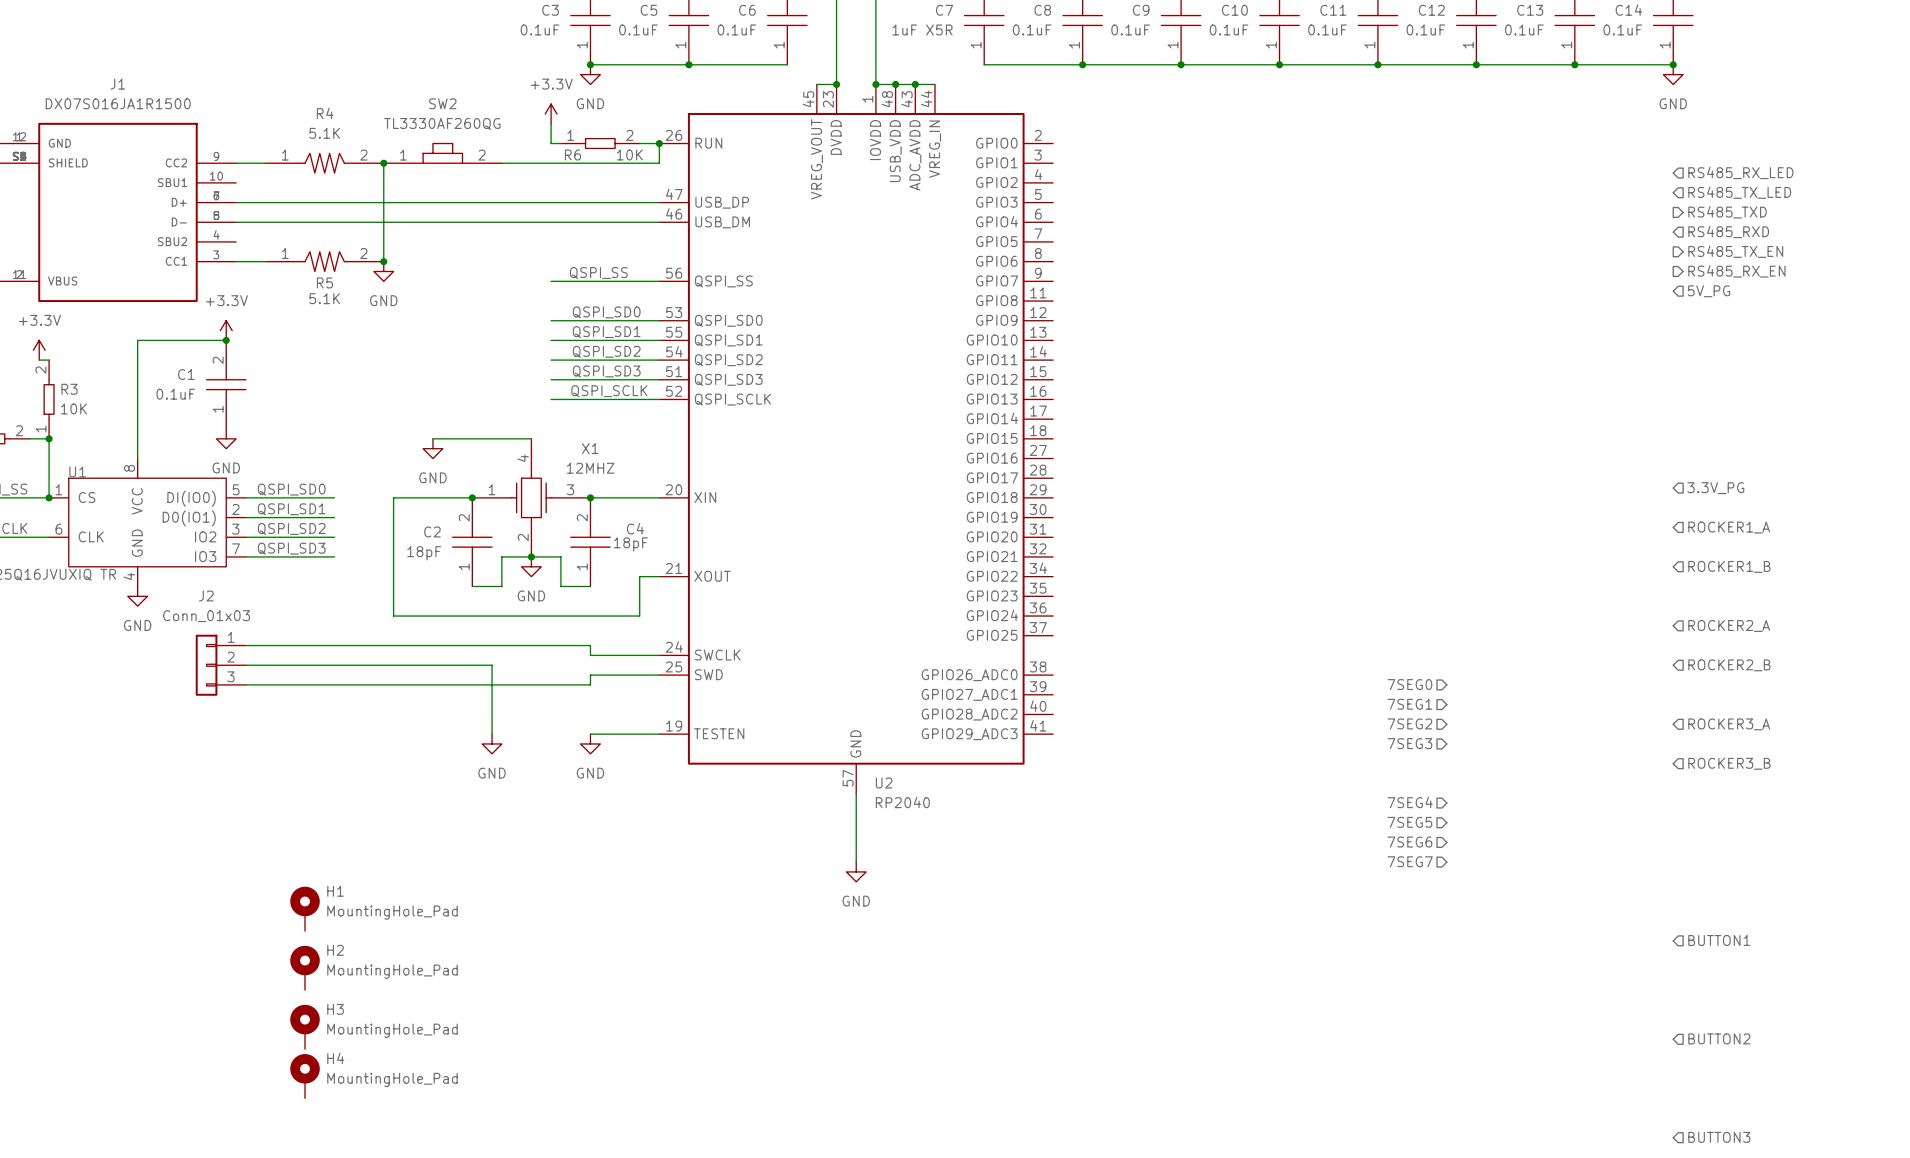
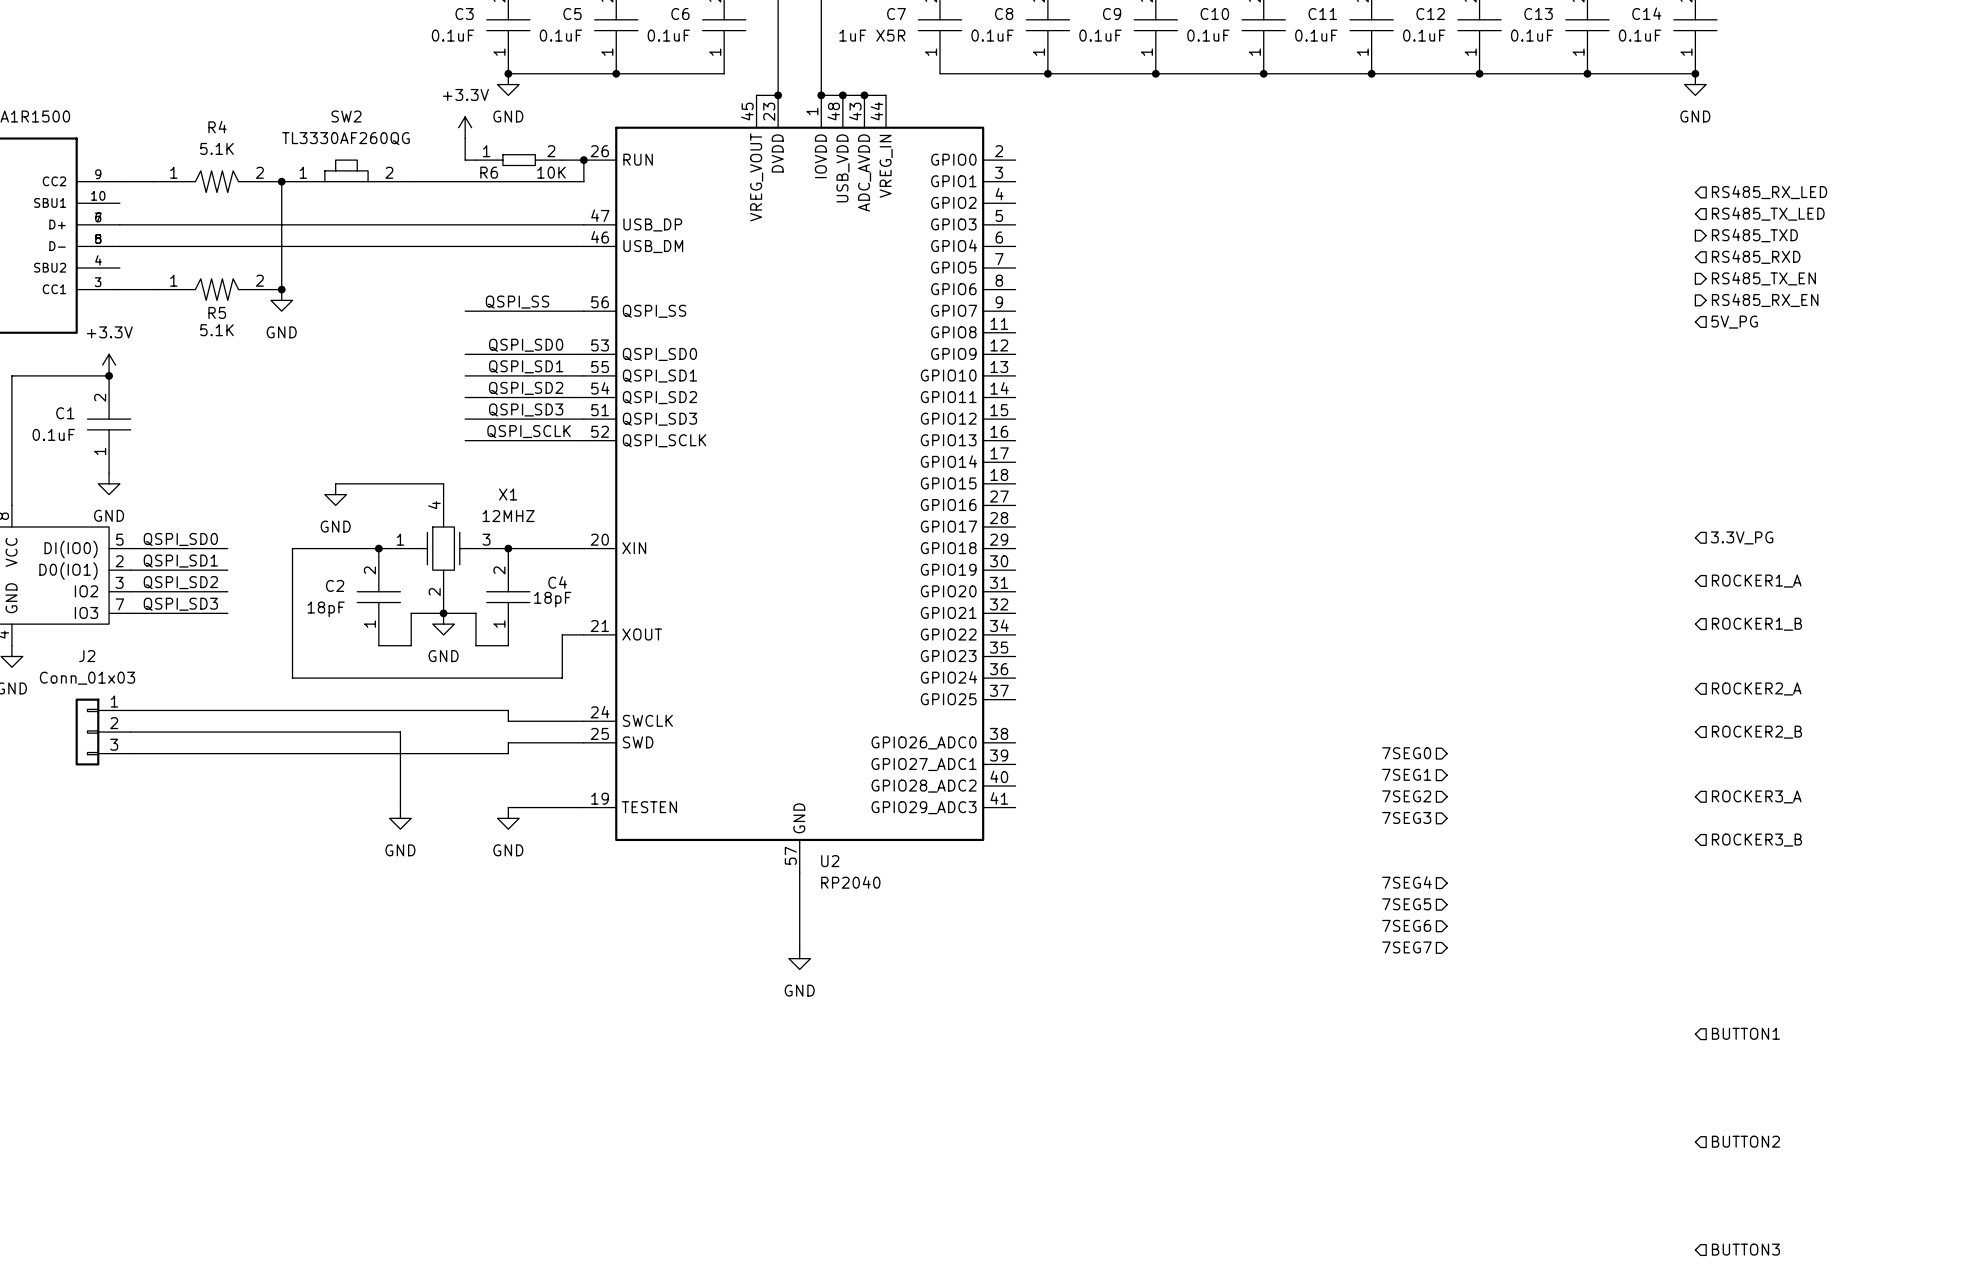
H1: MountingHole_Pad (305, 908) -> none
H2: MountingHole_Pad (305, 967) -> none
H3: MountingHole_Pad (305, 1026) -> none
H4: MountingHole_Pad (305, 1076) -> none

